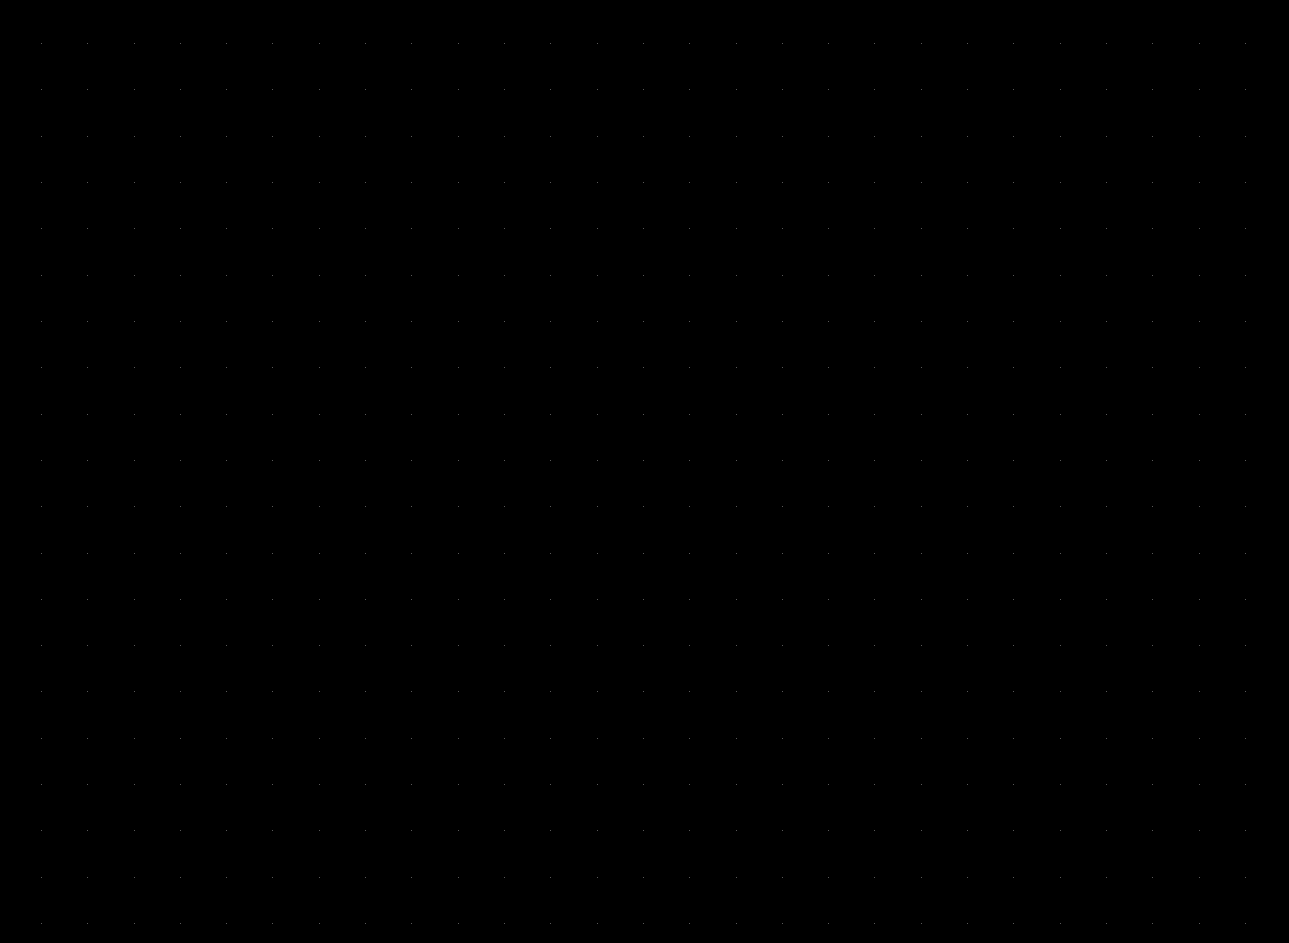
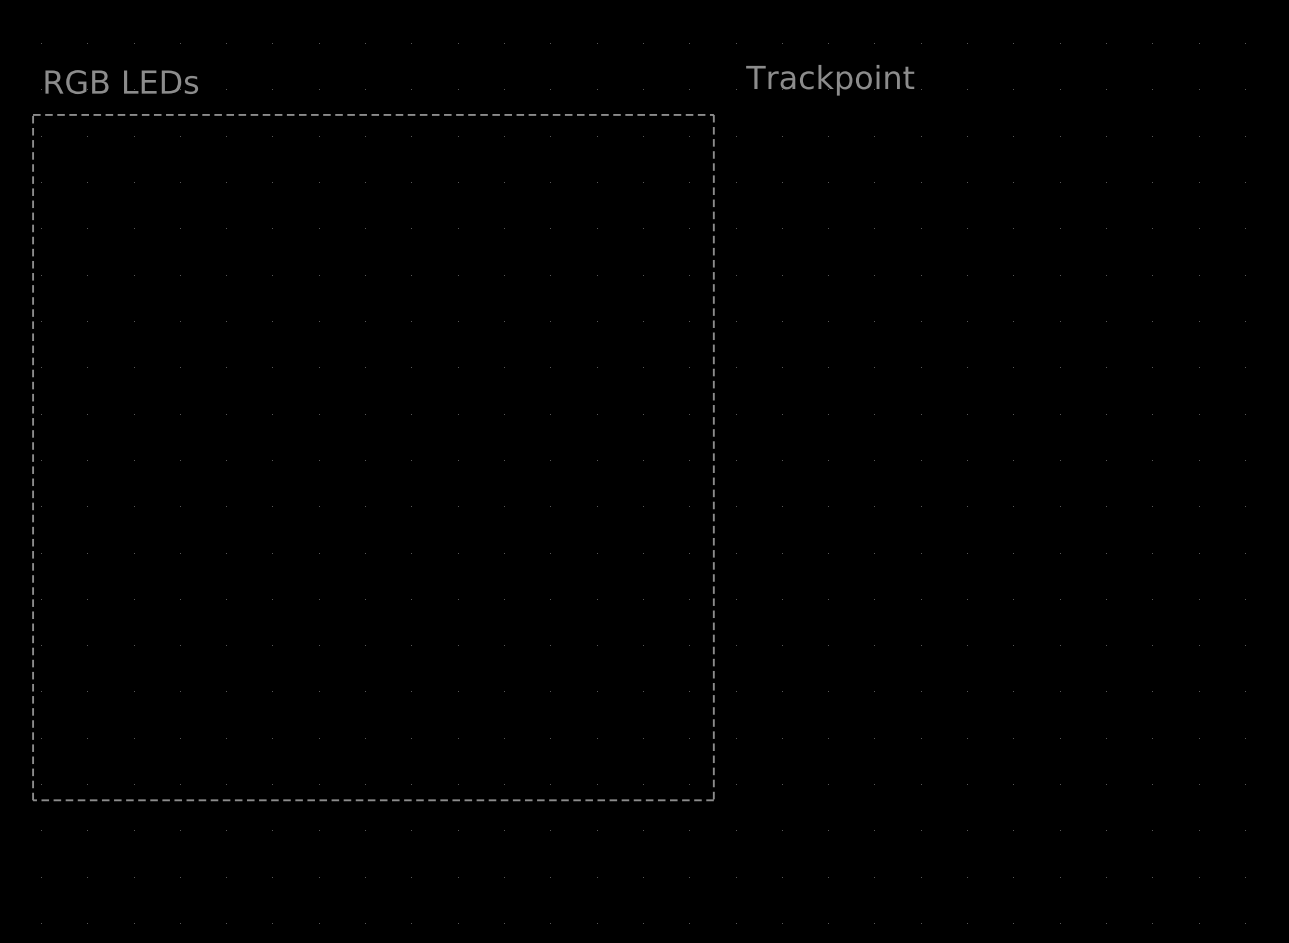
text: none -> Trackpoint (830, 80)
text: none -> RGB LEDs (121, 82)
line: none -> (33, 114) (713, 114) (713, 800) (33, 800) (33, 114)

